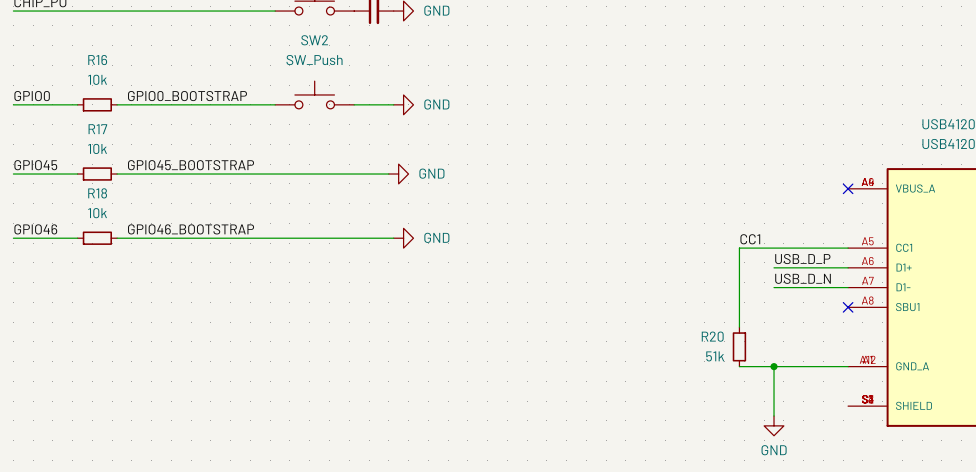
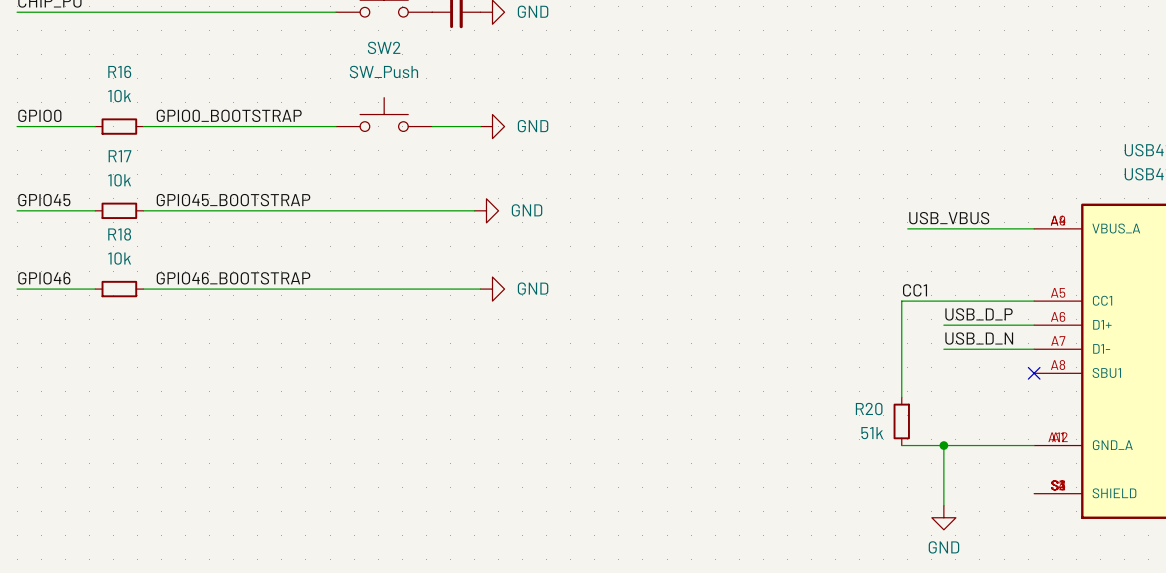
label: none -> USB_VBUS (949, 218)
wire: none -> (907, 228) (1034, 228)
no-connect mark: (848, 188) -> none

